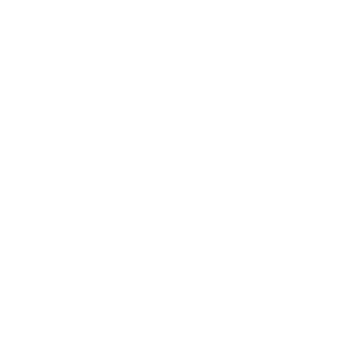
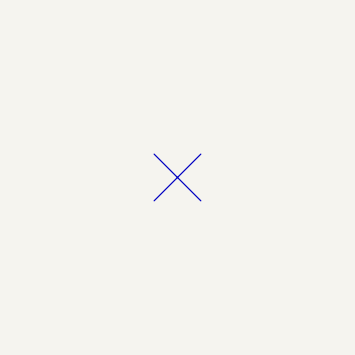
no-connect mark: none -> (177, 177)

